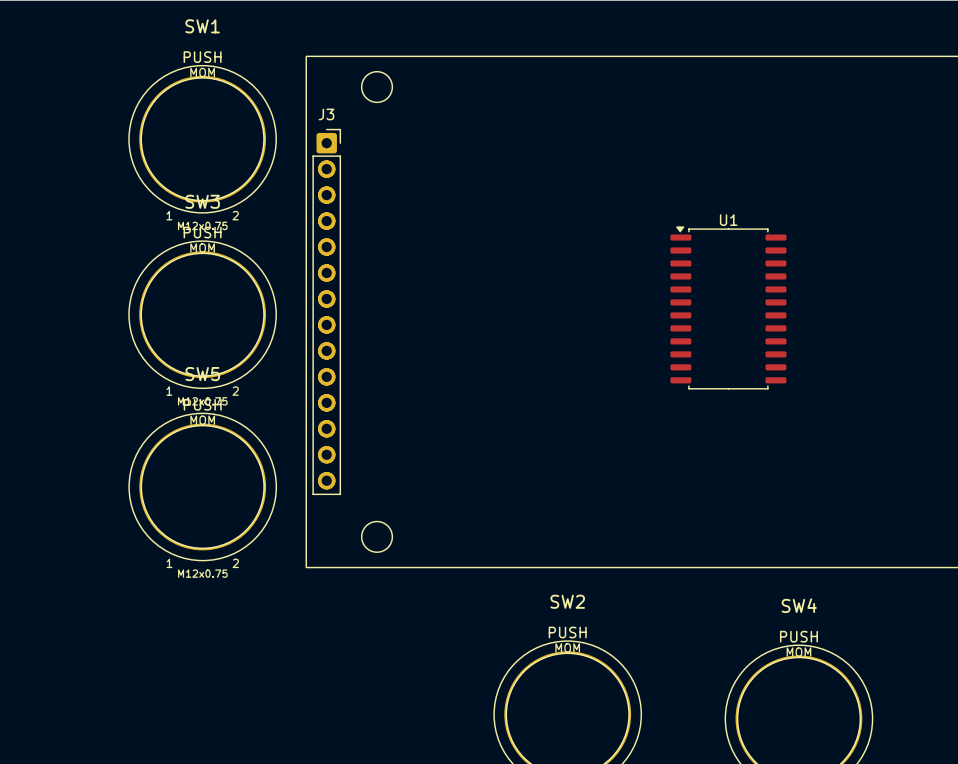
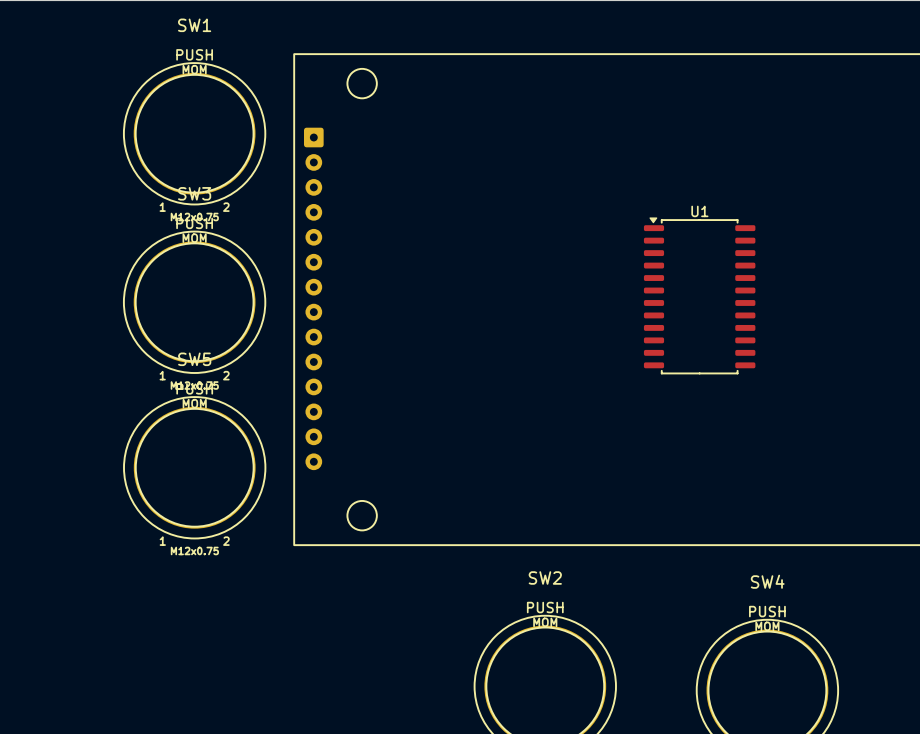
J3: (326, 311) -> none

